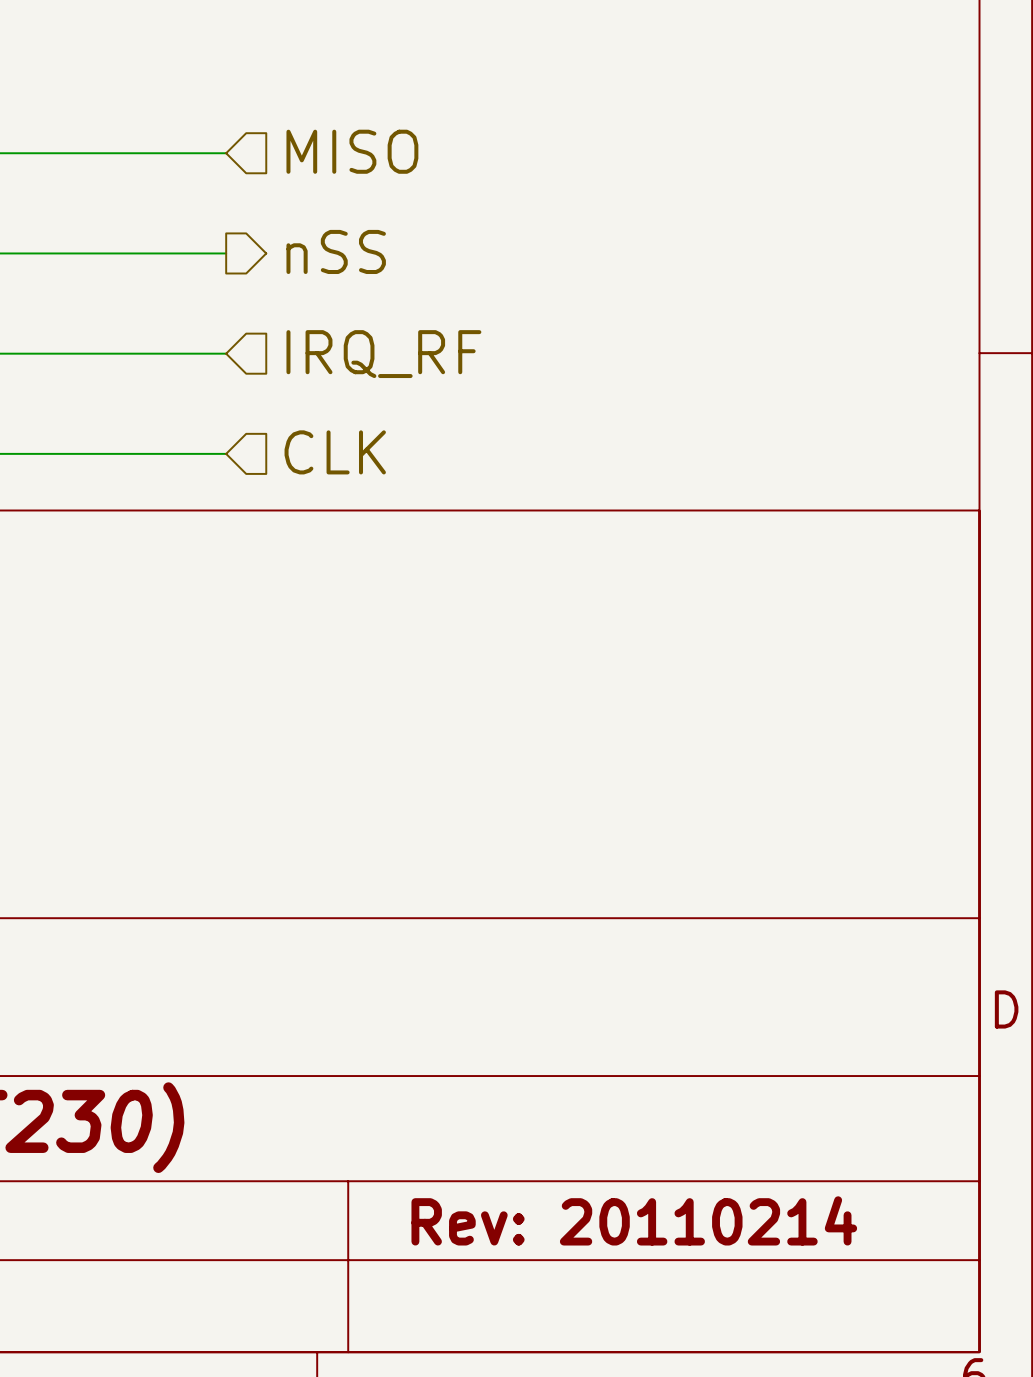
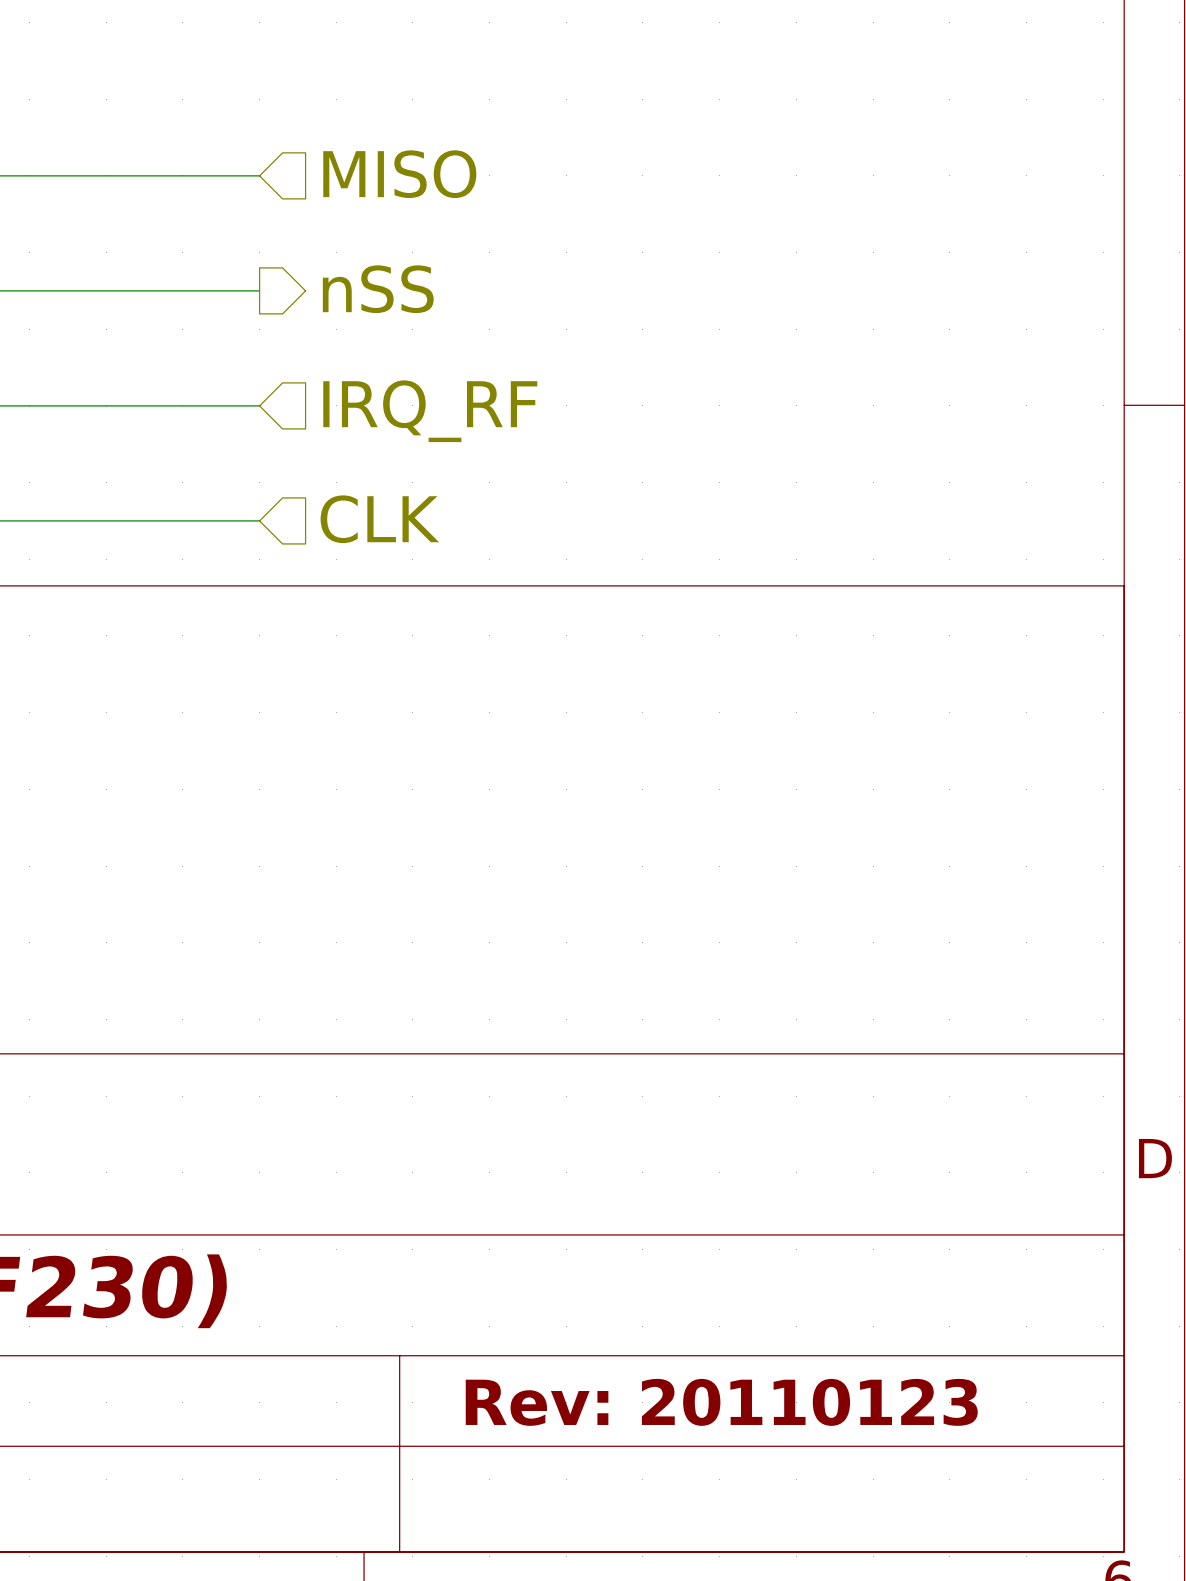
title block: Rev: 20110214 (634, 1220) -> Rev: 20110123 (721, 1402)

